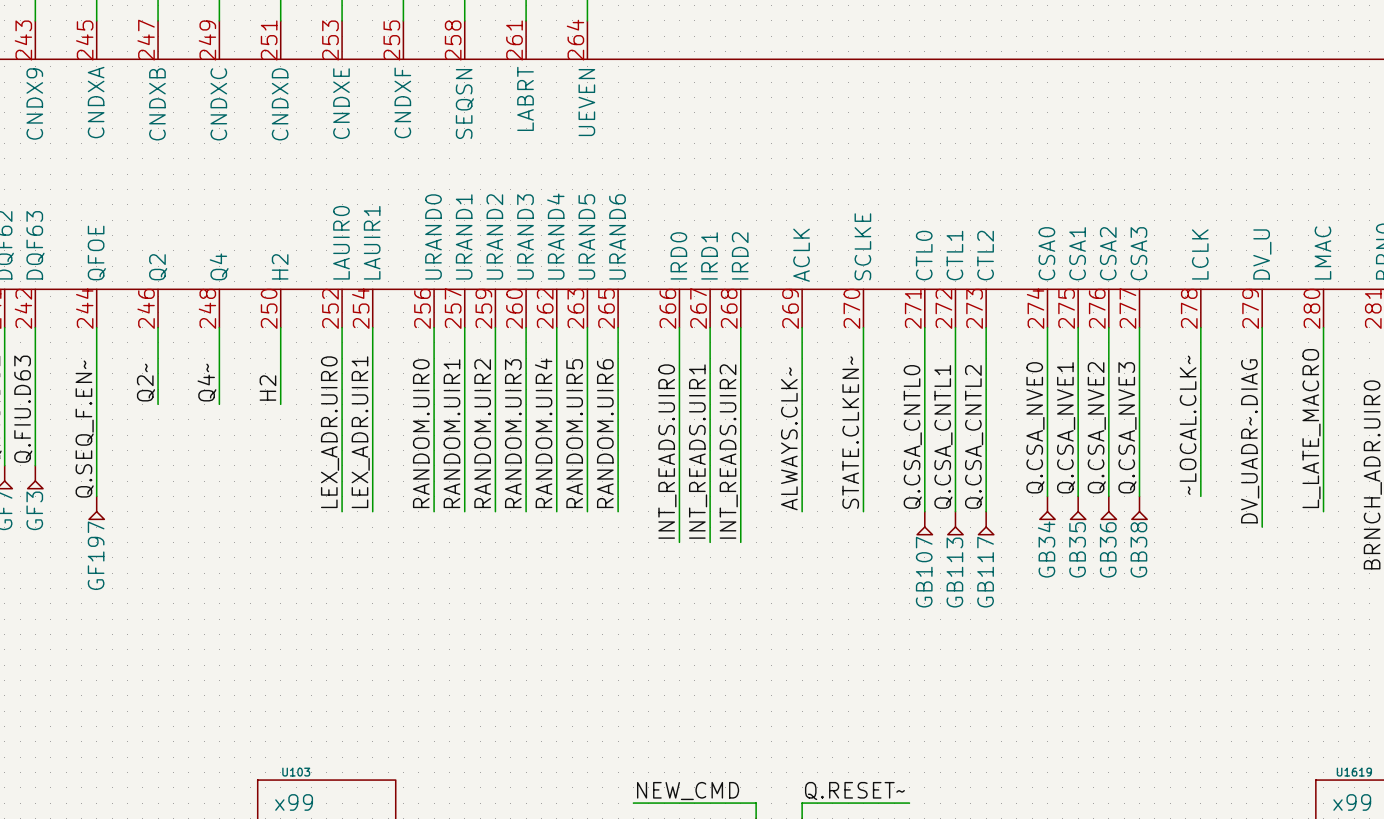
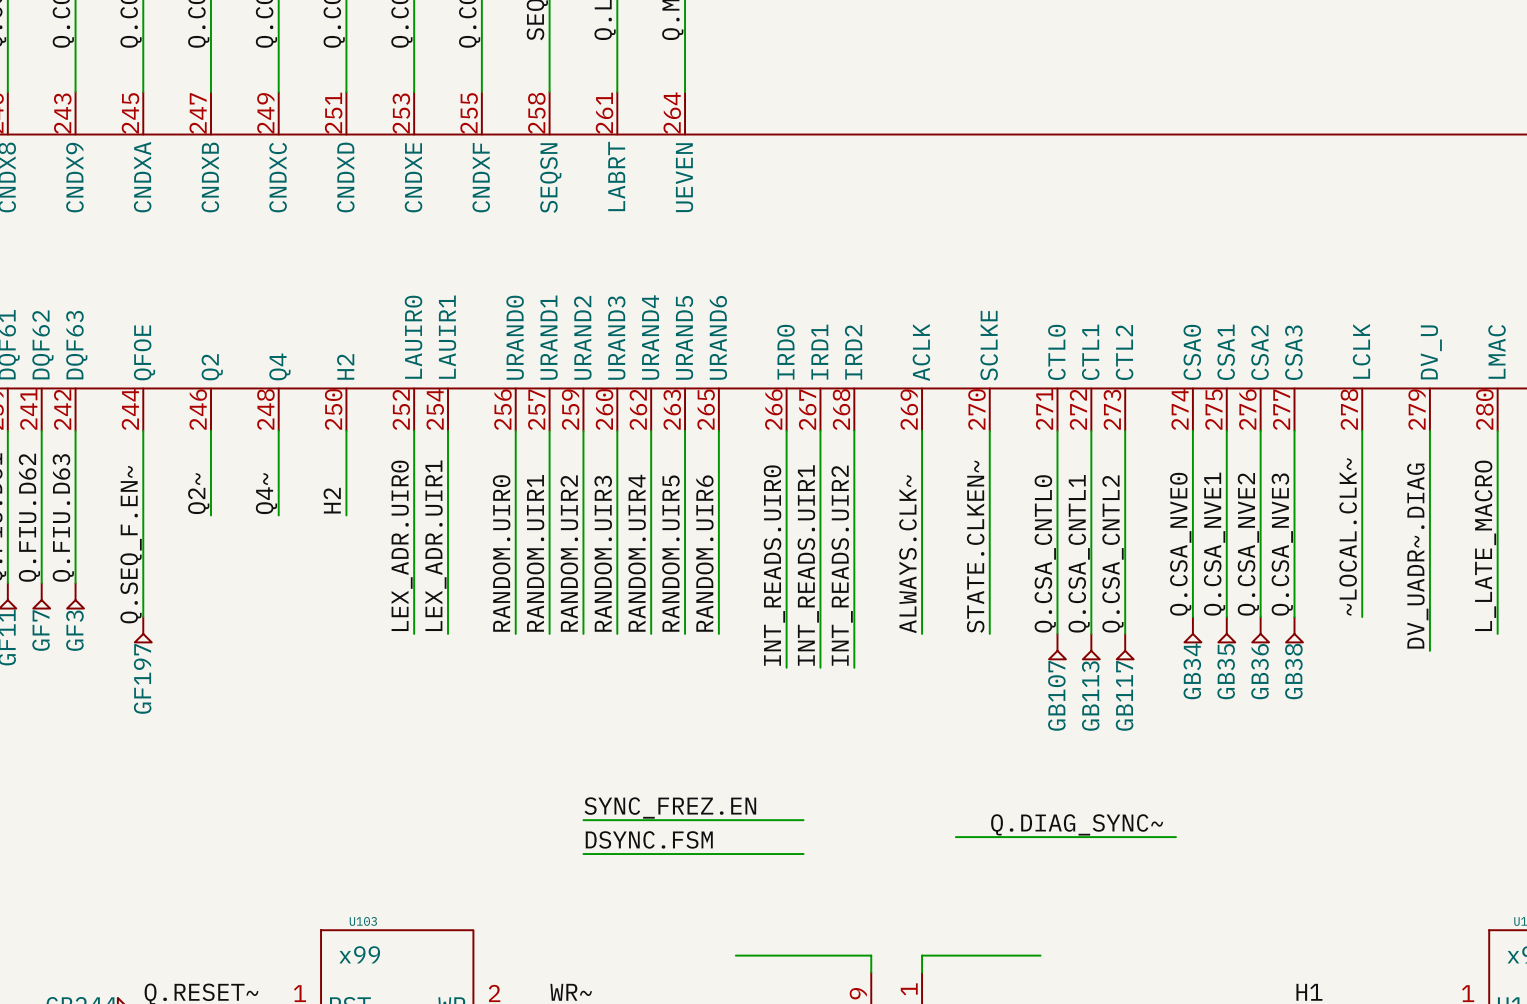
label: none -> SYNC_FREZ.EN (670, 807)
wire: none -> (583, 820) (803, 820)
label: none -> Q.DIAG_SYNC~ (1077, 824)
wire: none -> (955, 837) (1175, 837)
label: none -> DSYNC.FSM (649, 839)
wire: none -> (583, 854) (803, 854)
label: NEW_CMD (688, 791) -> none
label: Q.RESET~ (854, 791) -> none

